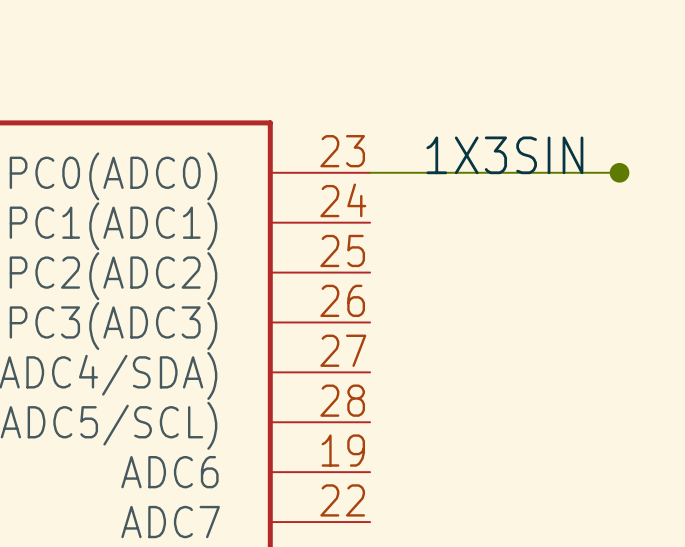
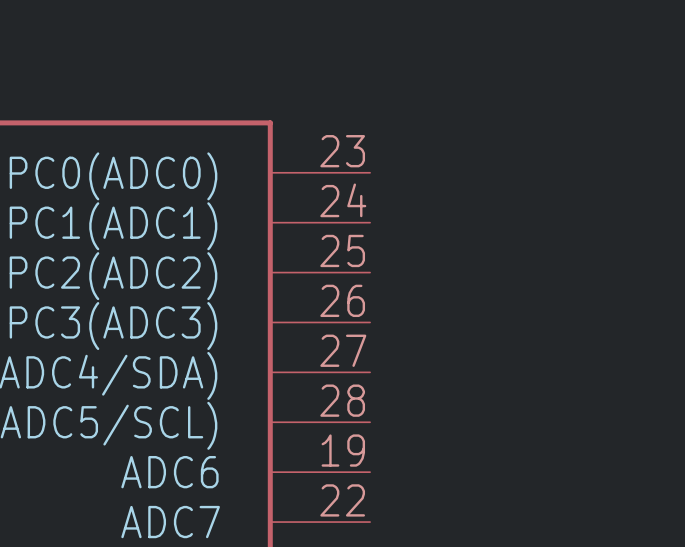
label: 1X3SIN (504, 155) -> none
wire: (370, 172) (619, 172) -> none
junction: (619, 172) -> none

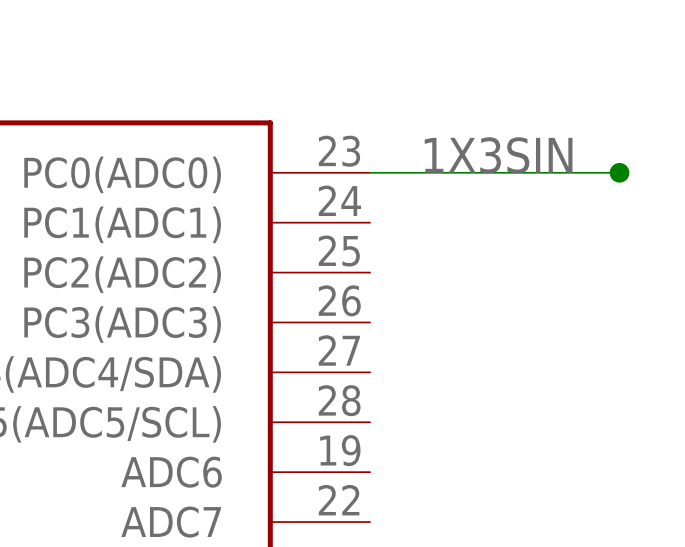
label: none -> 1X3SIN (498, 155)
wire: none -> (370, 172) (619, 172)
junction: none -> (619, 172)

